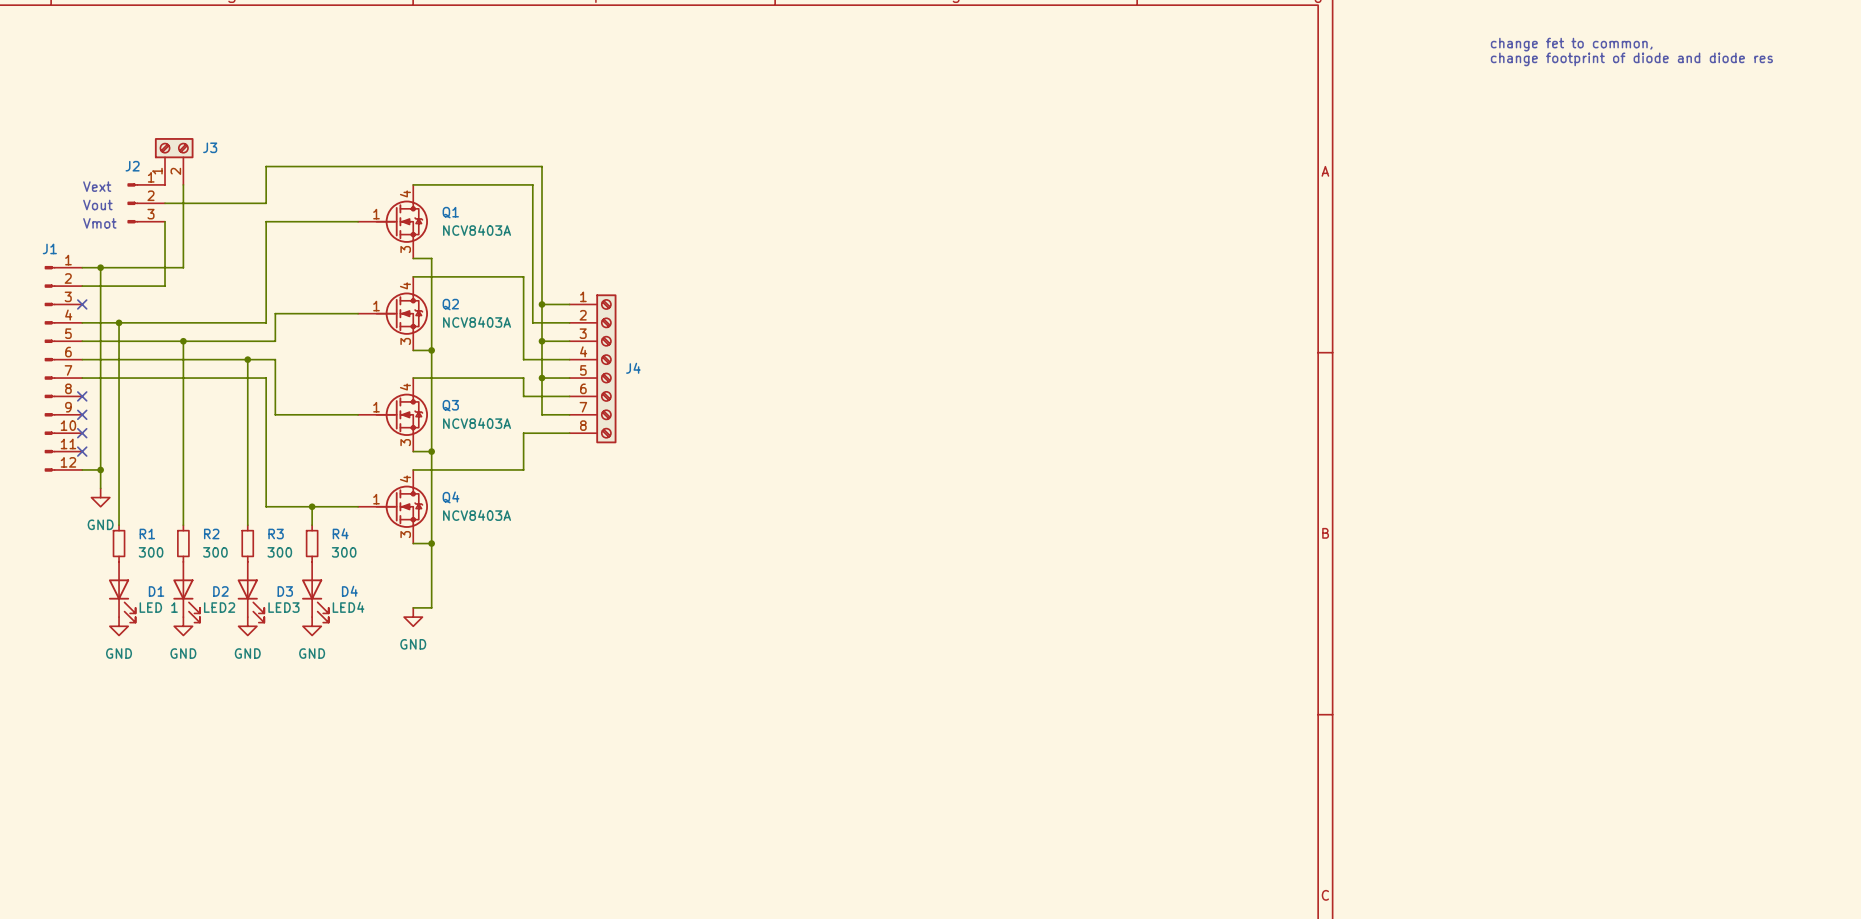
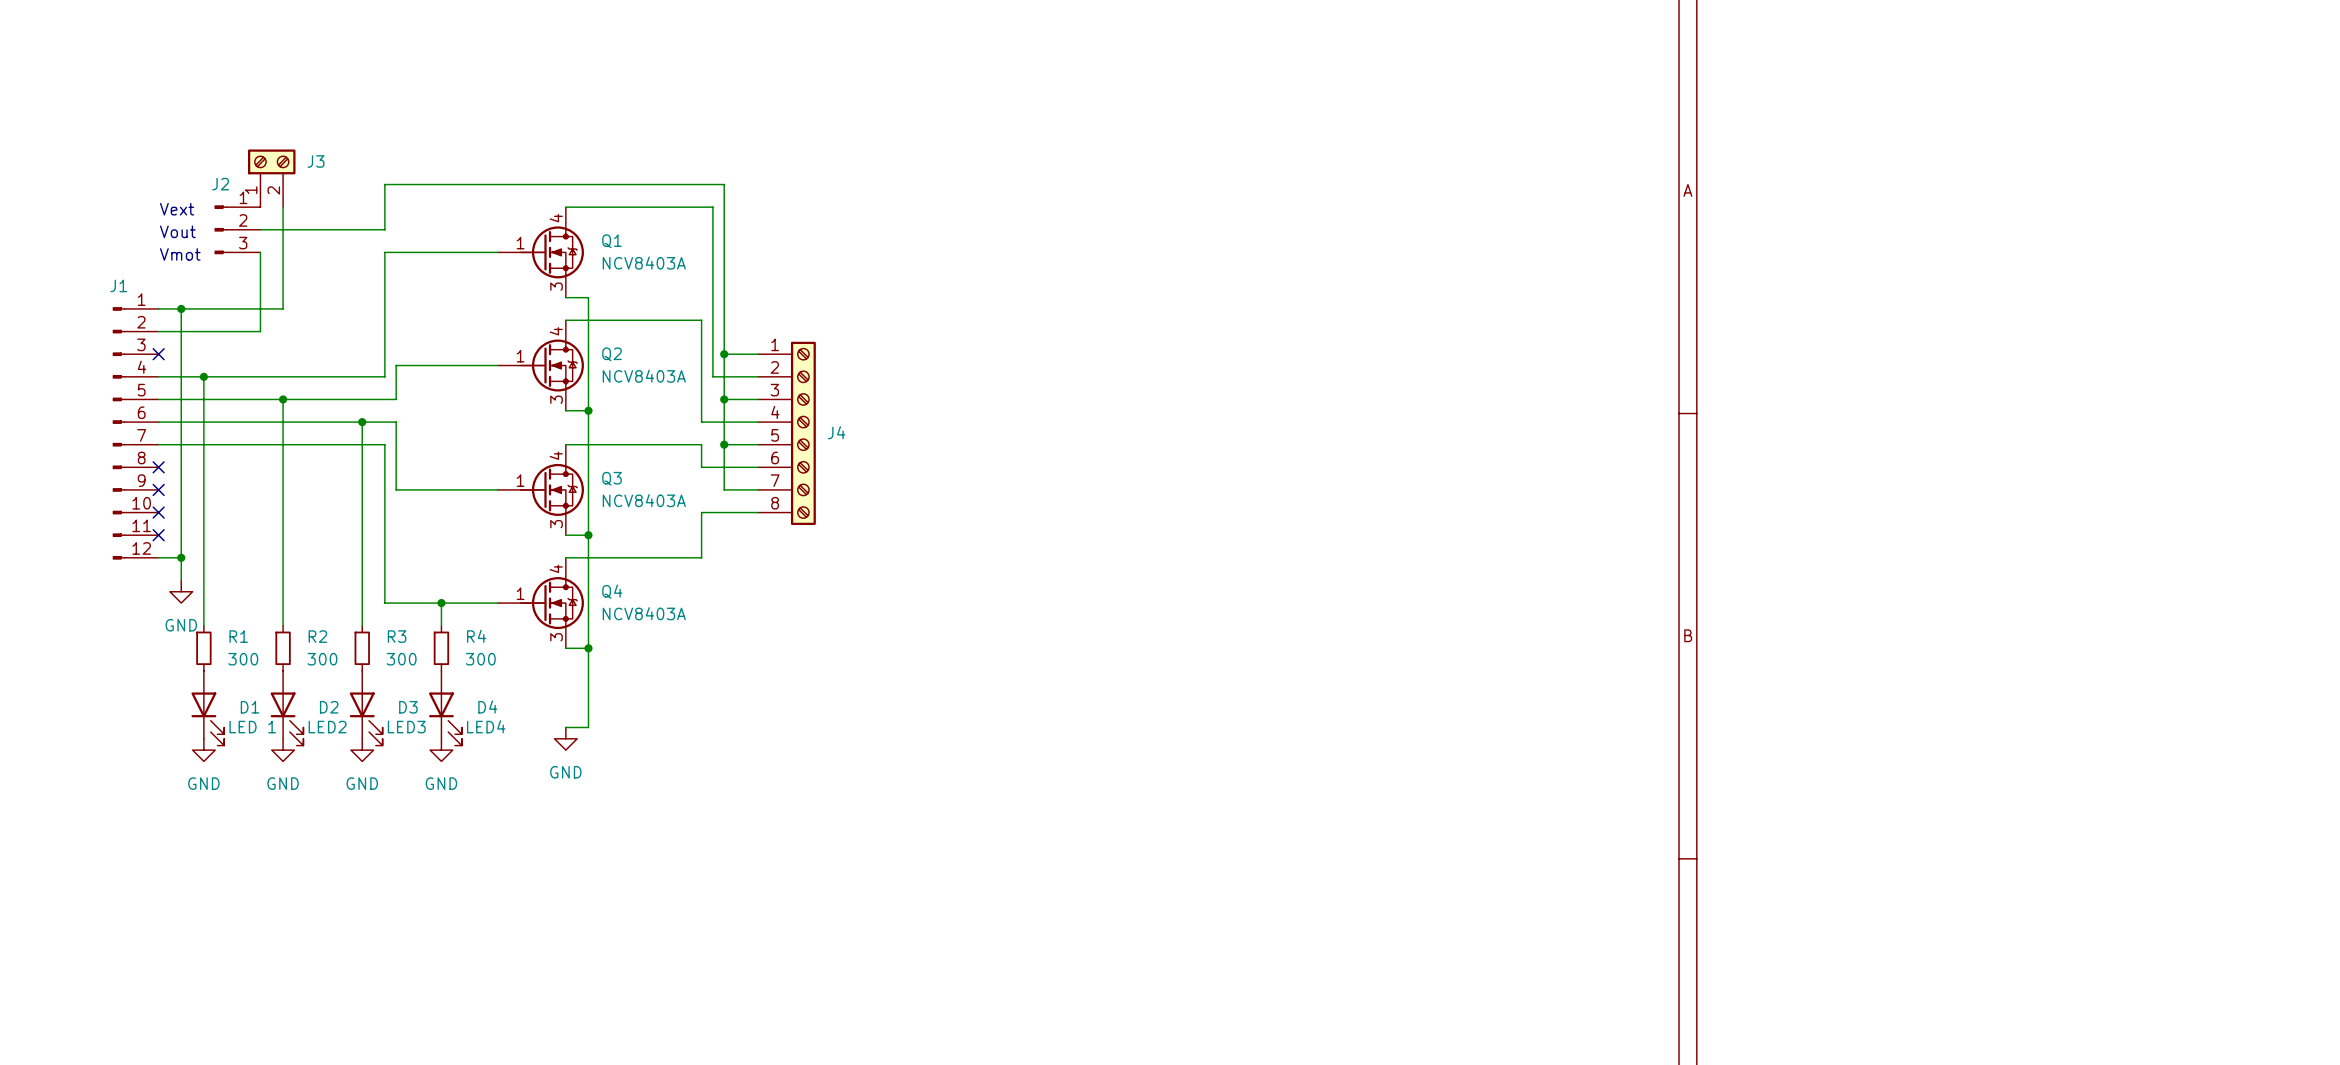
text: change fet to common, (1571, 44) -> none
text: change footprint of diode and diode res (1631, 59) -> none

